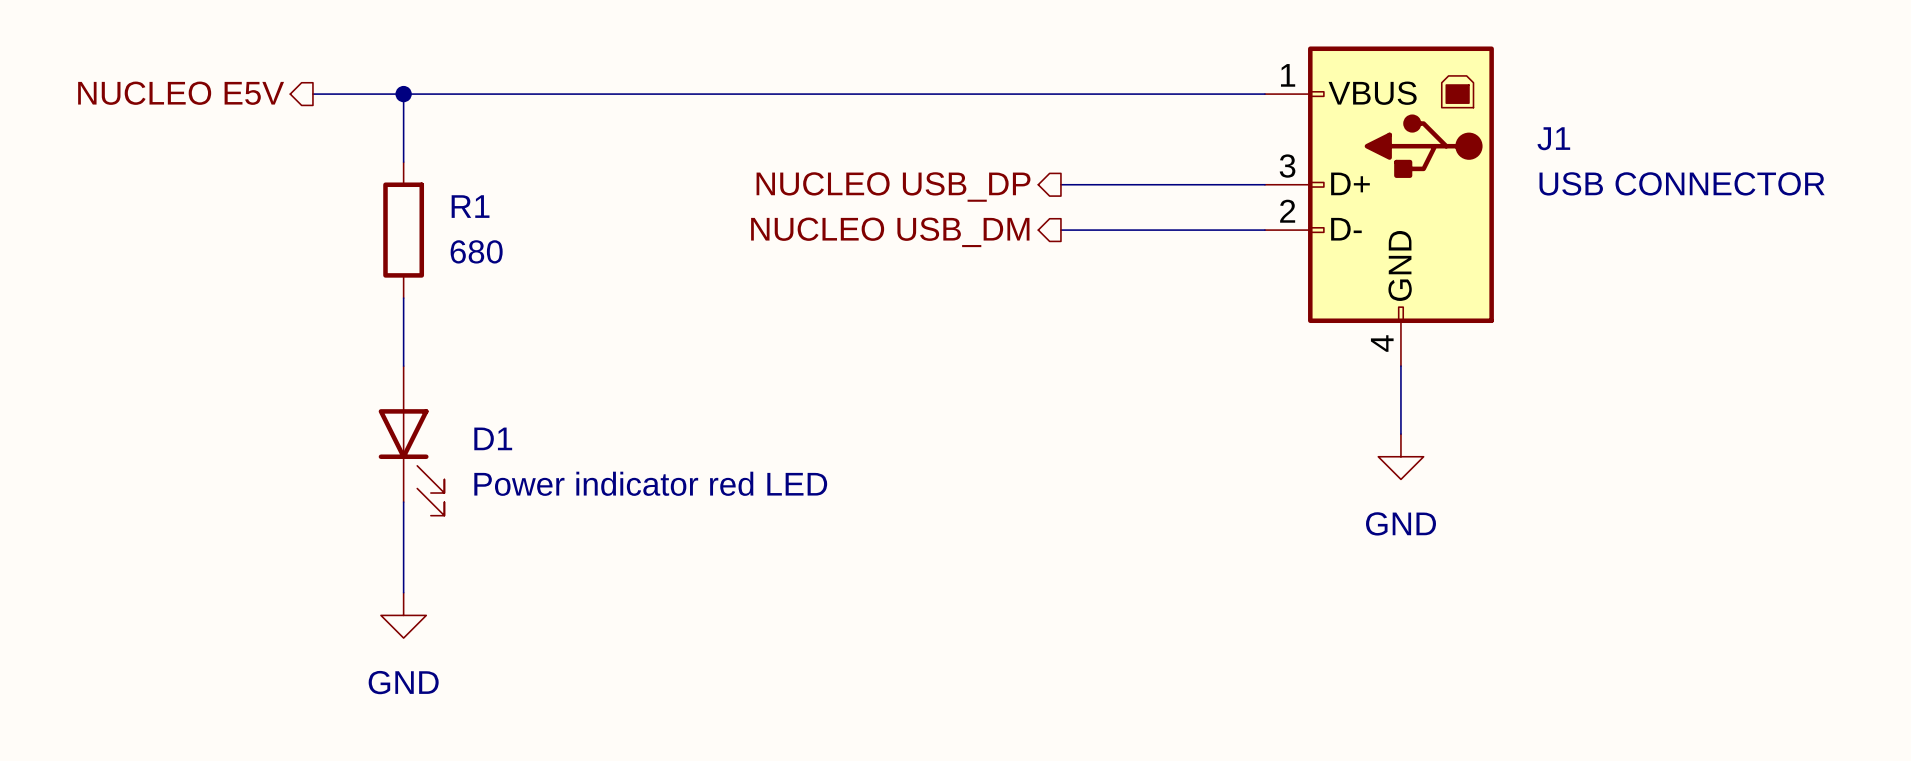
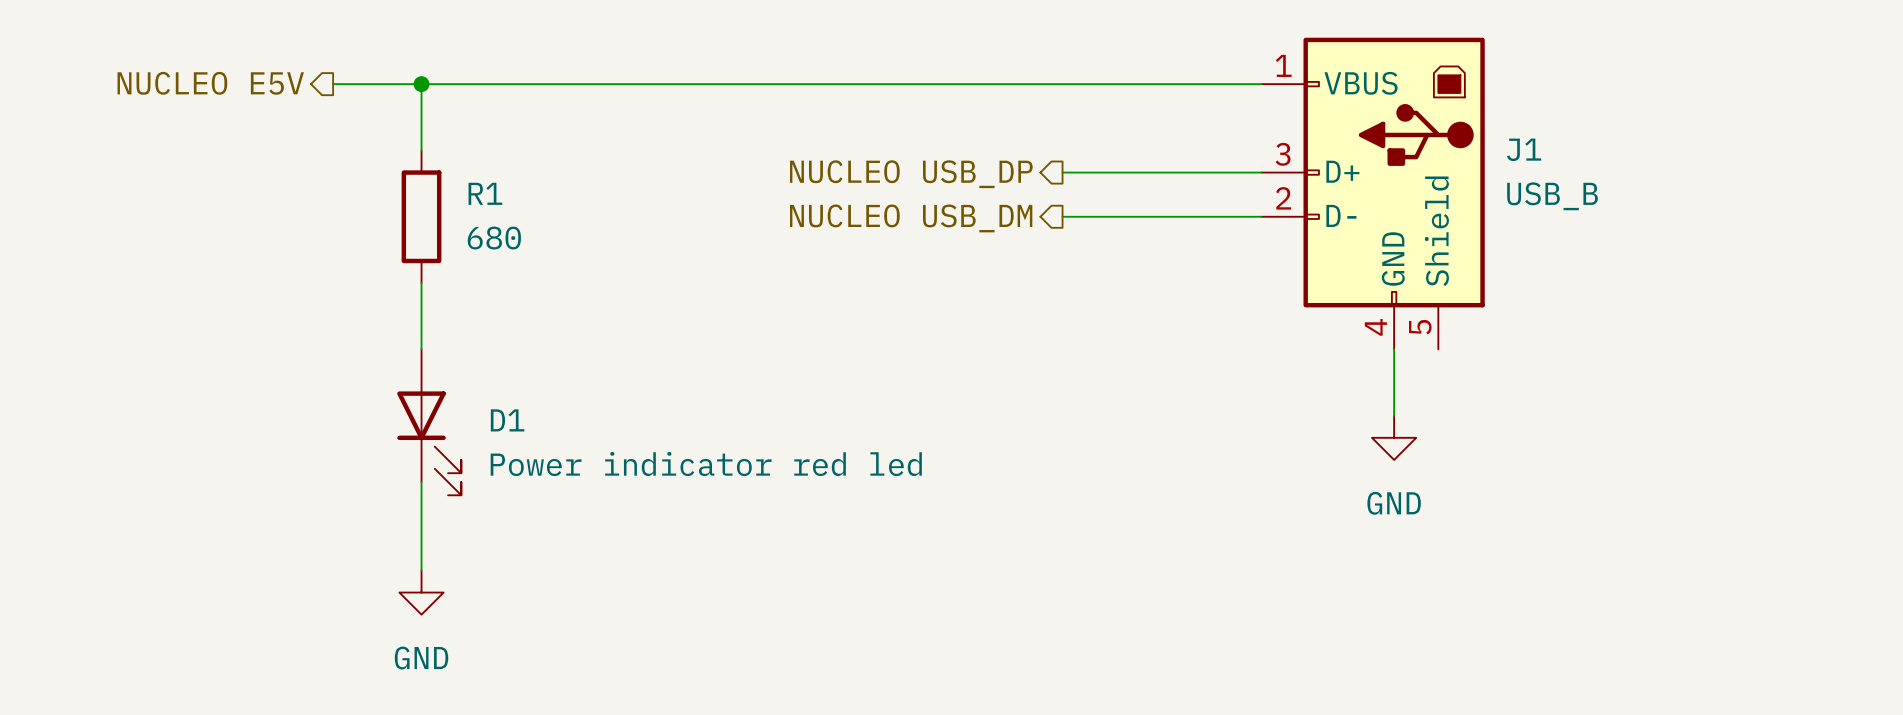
J1 symbol: [1264, 46, 1494, 367] -> [1261, 37, 1485, 350]
J1 value: USB CONNECTOR (1682, 183) -> USB_B (1552, 196)
D1 value: Power indicator red LED (650, 483) -> Power indicator red led (706, 464)

